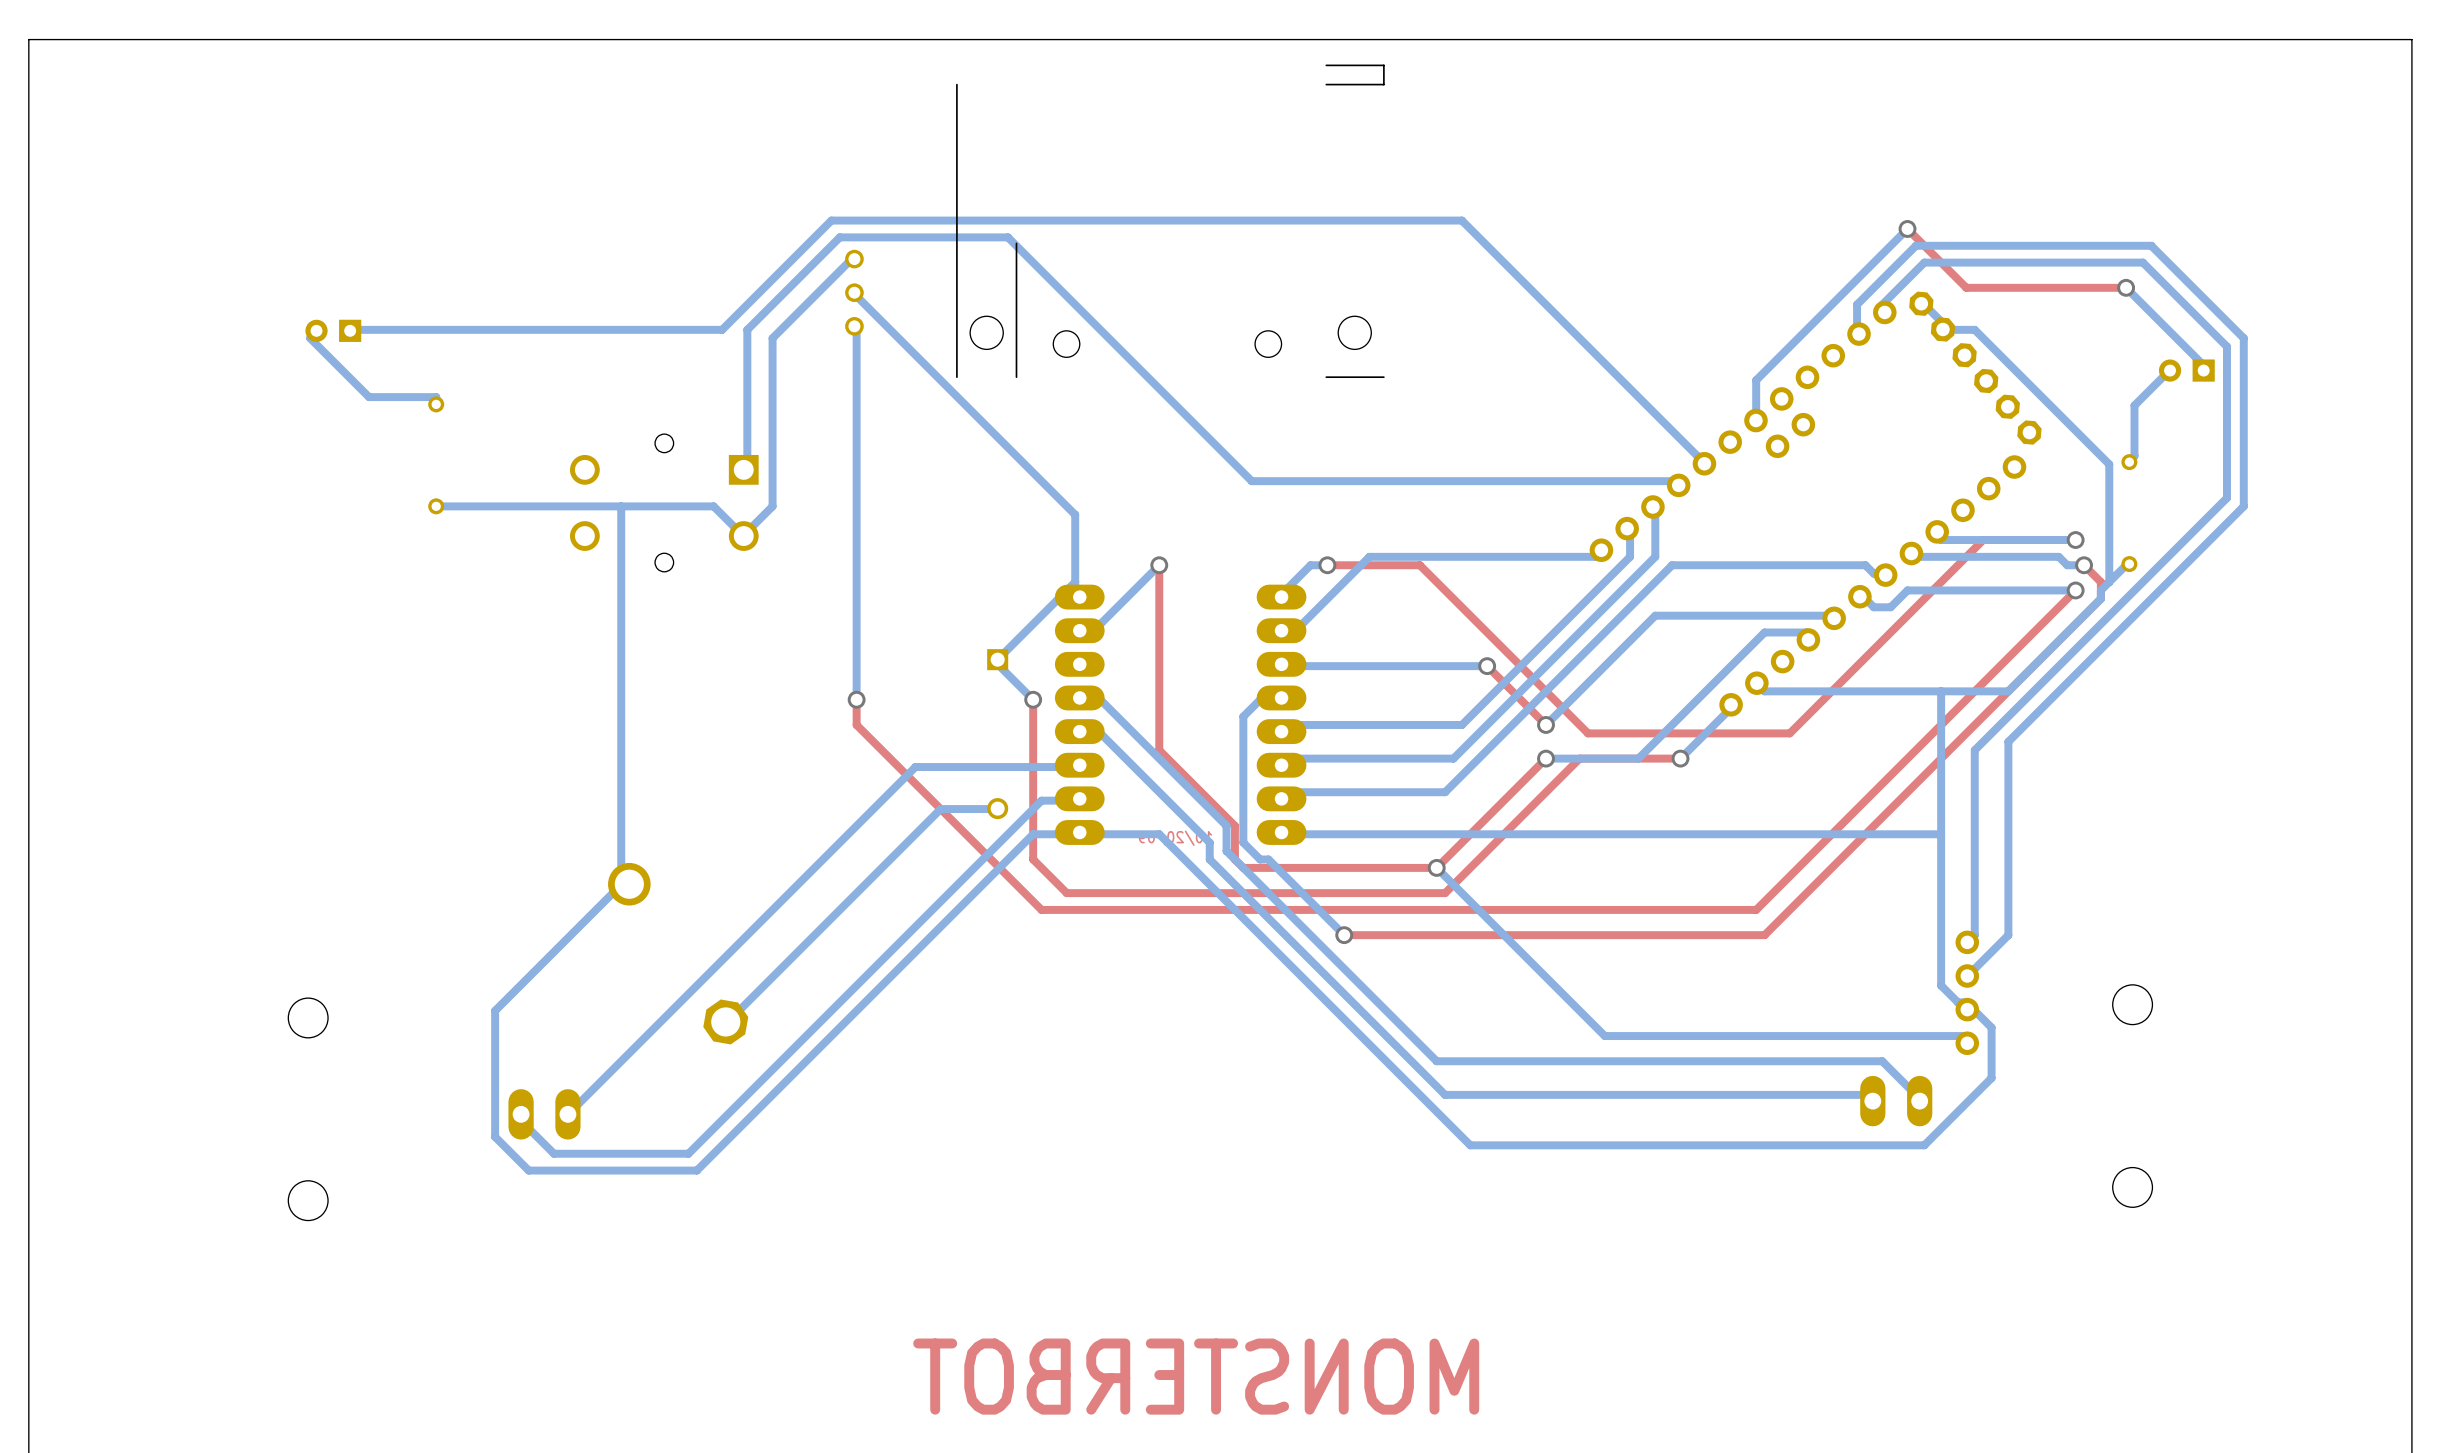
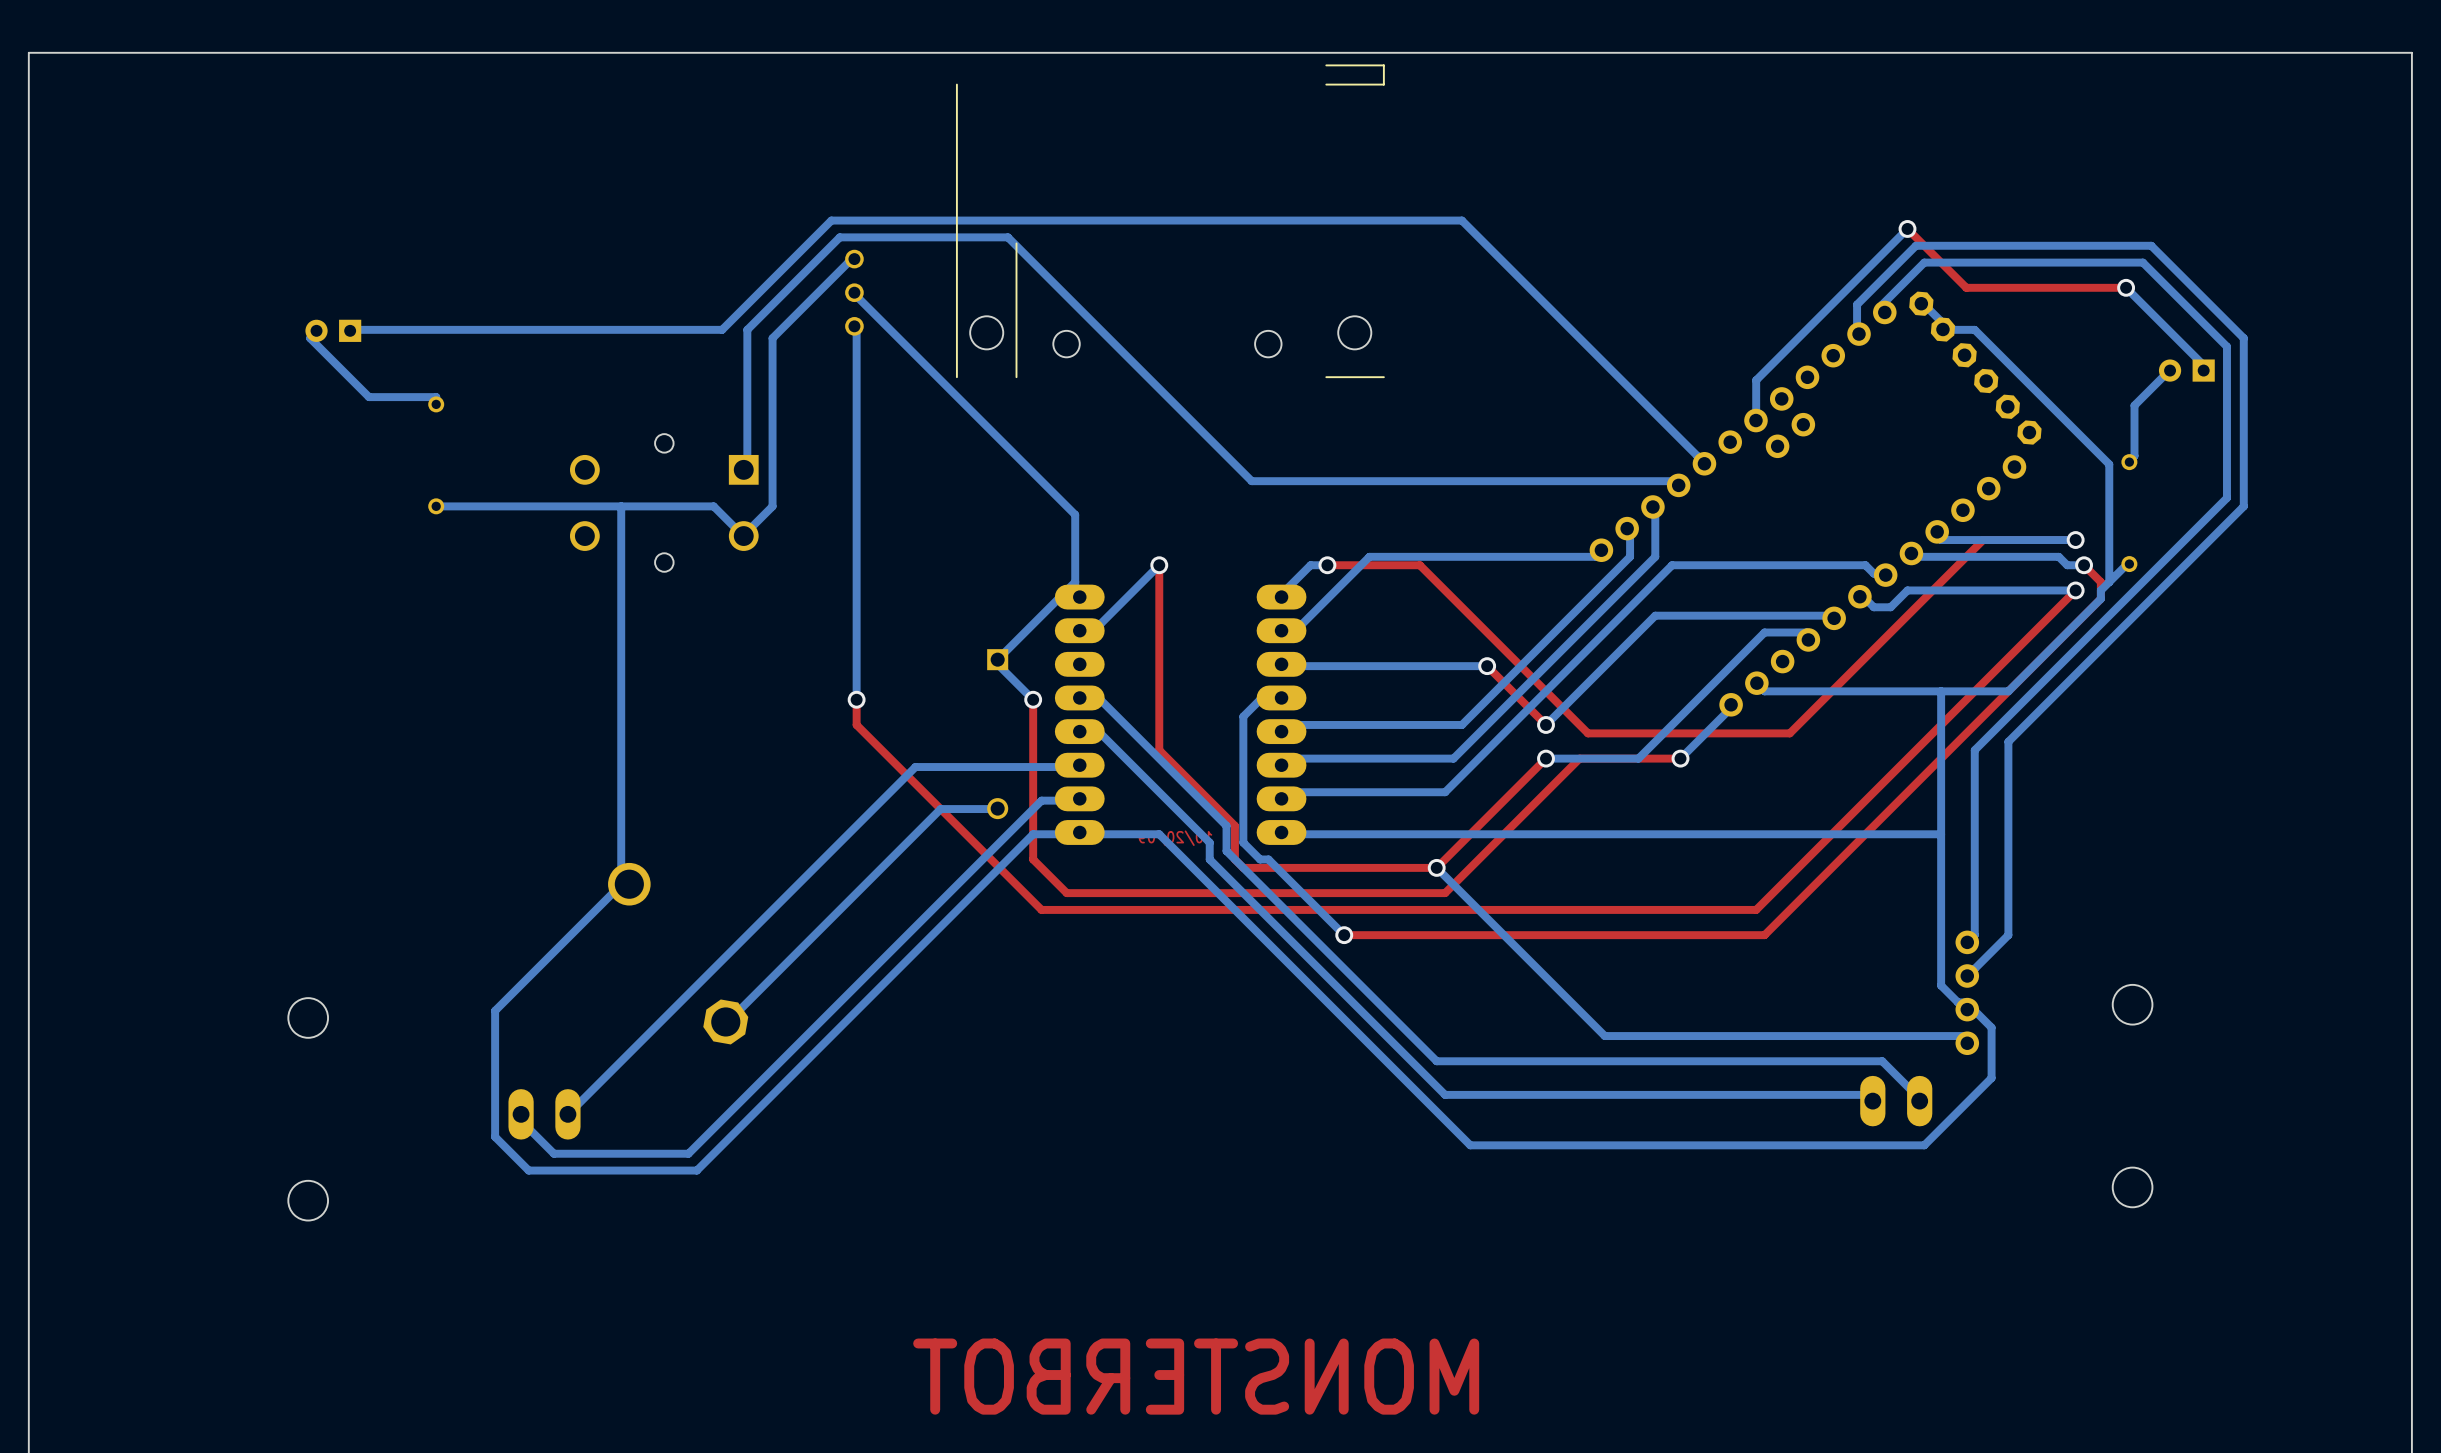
board edge: (2411, 52) (2411, 39) (28, 39) (28, 52) -> (2411, 52) (28, 52)

